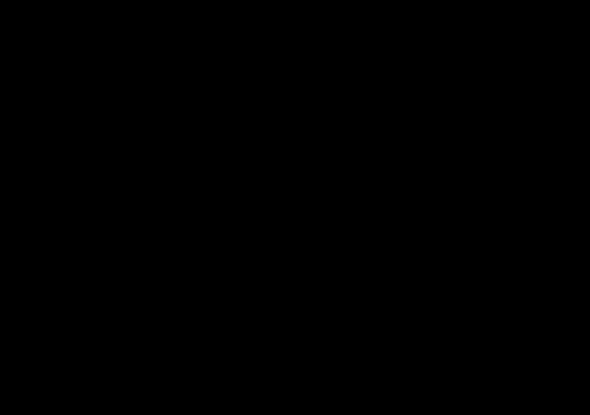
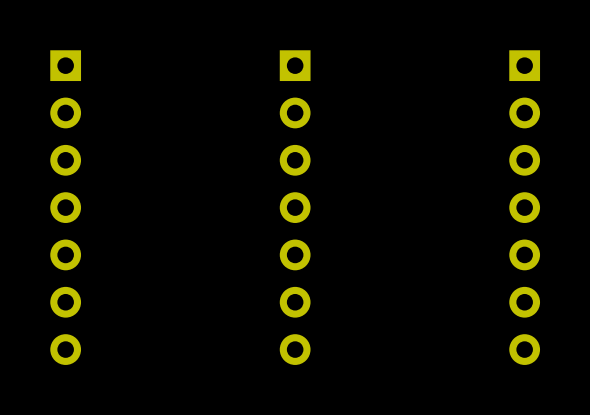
part: none -> (65, 207)
part: none -> (295, 207)
part: none -> (524, 207)

